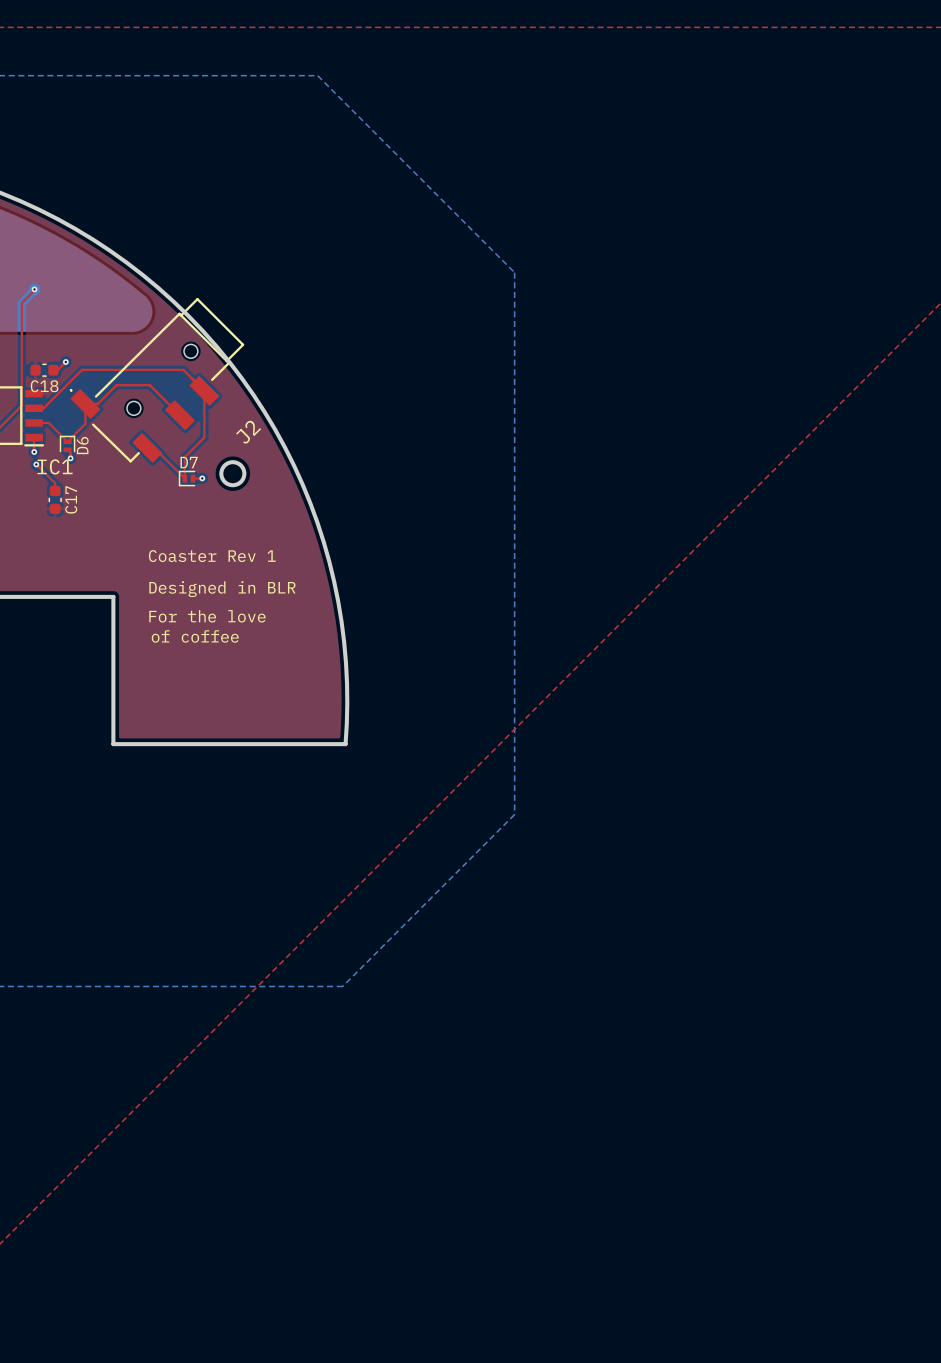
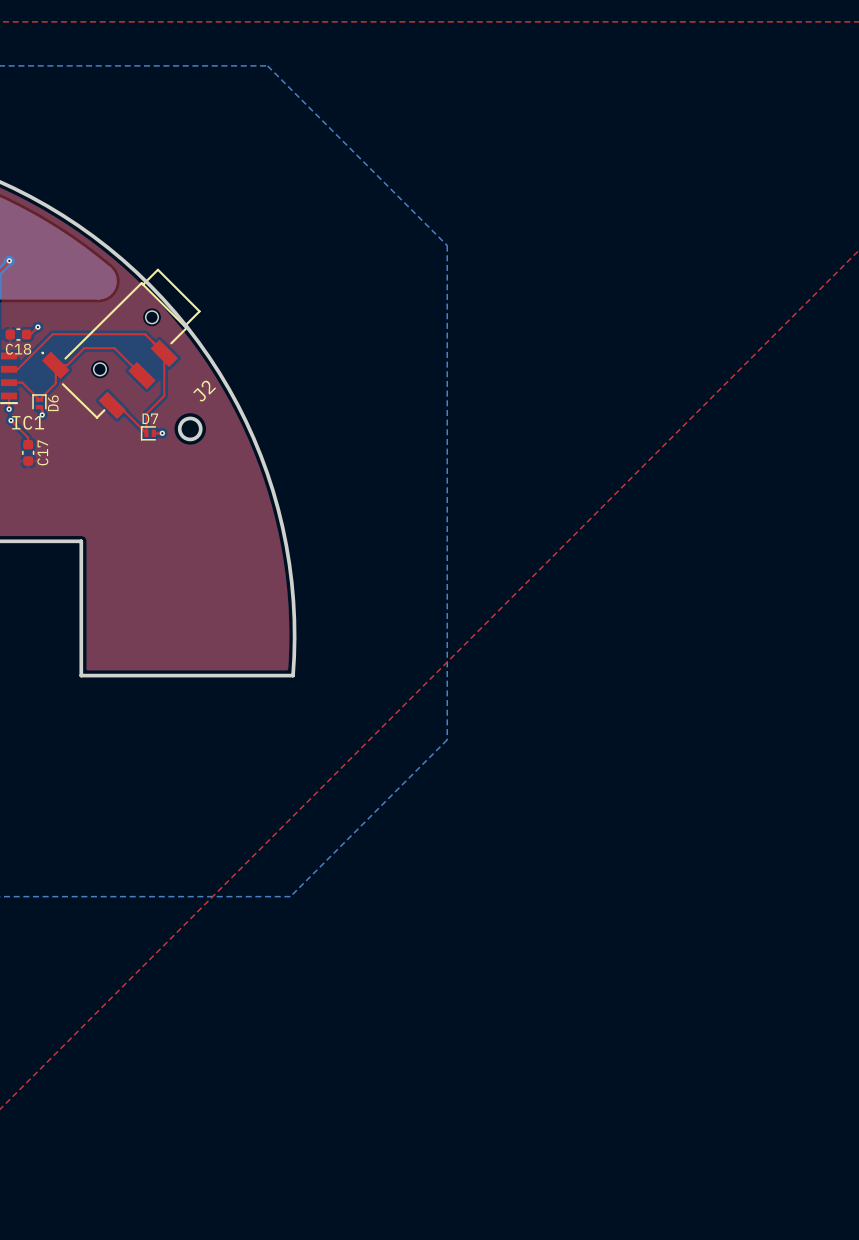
text: Coaster Rev 1 (212, 556) -> none
text: Designed in BLR (222, 589) -> none
text: For the love (207, 616) -> none
text: of coffee (195, 636) -> none

